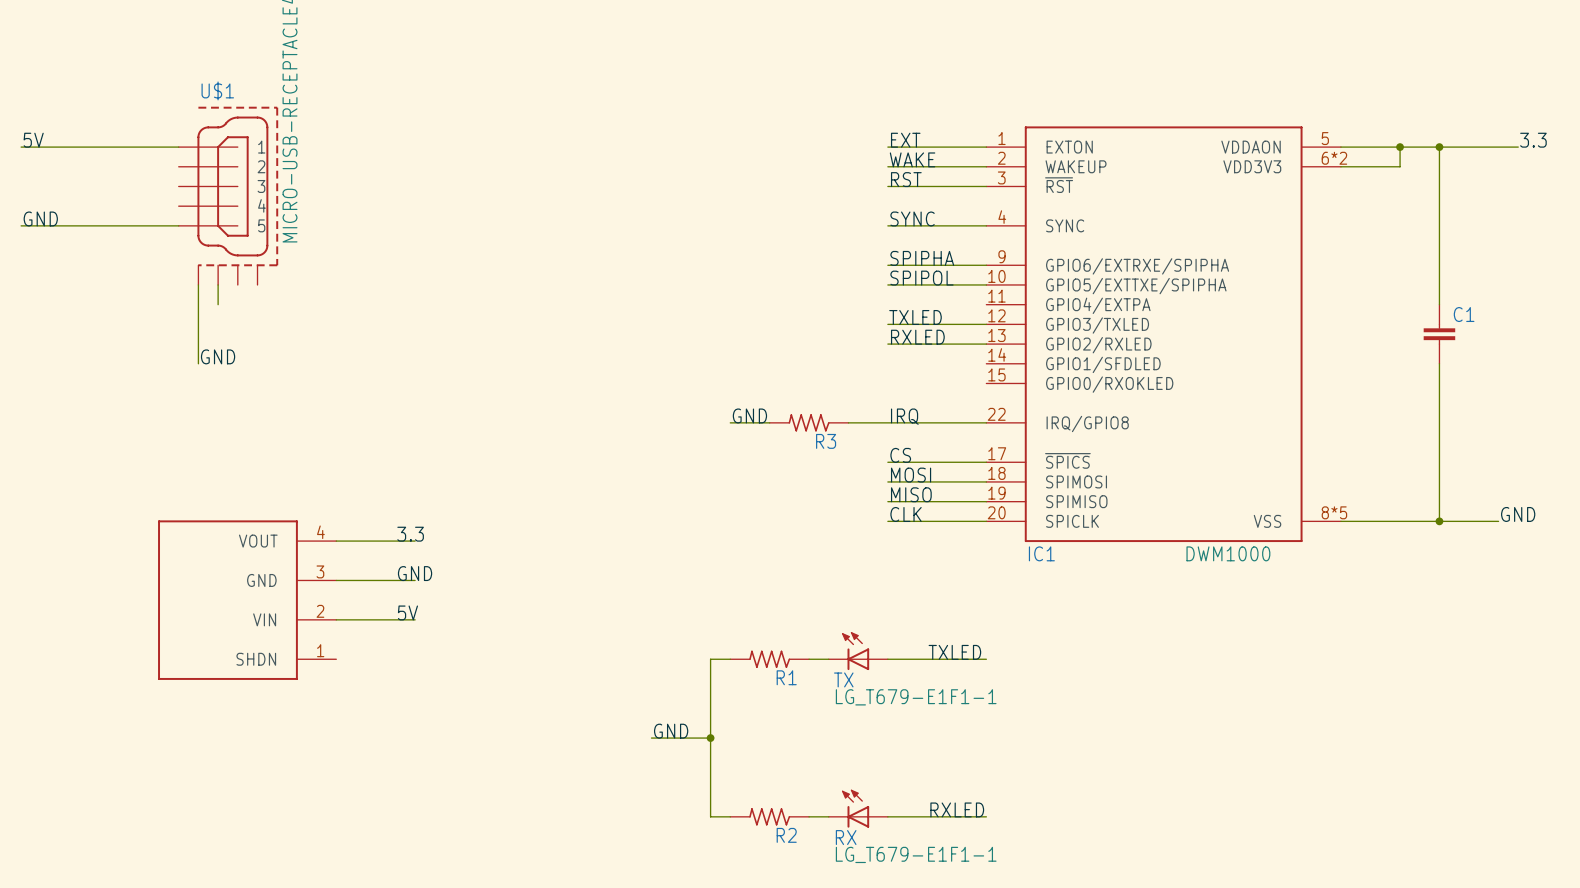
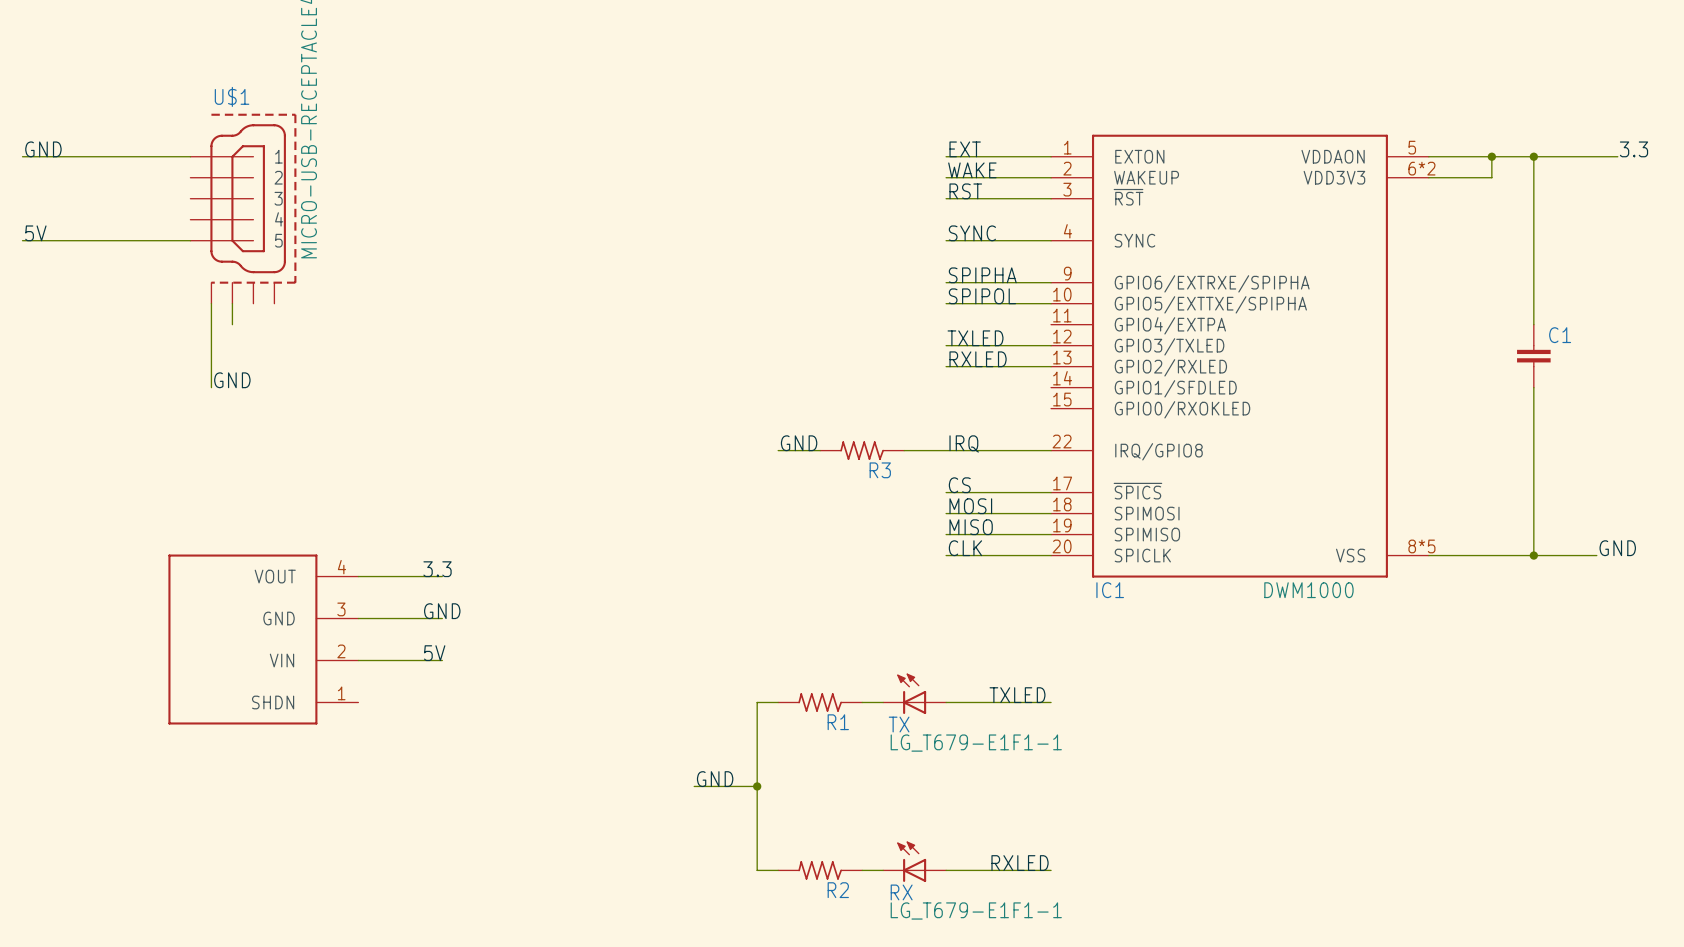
label: 5V (33, 140) -> GND (43, 149)
label: GND (40, 218) -> 5V (35, 233)

